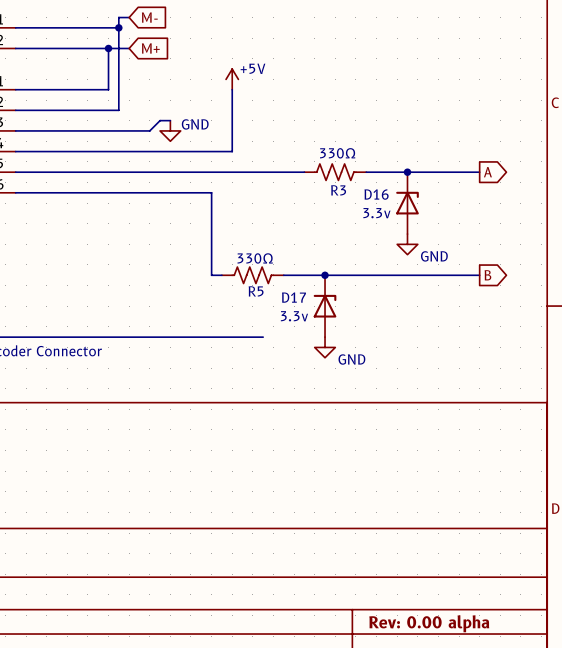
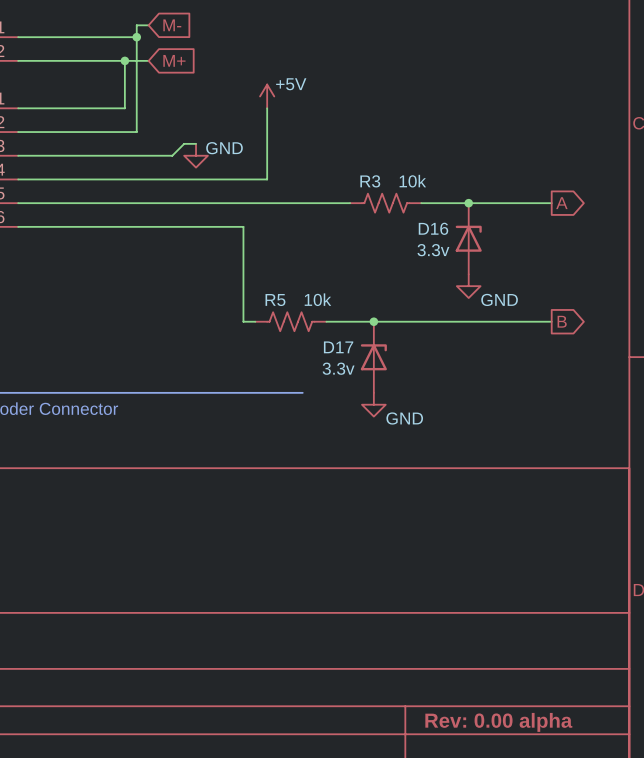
R3 value: 330Ω (337, 153) -> 10k (412, 181)
R3 name position: R3 (338, 190) -> R3 (370, 181)
R5 value: 330Ω (255, 258) -> 10k (317, 299)
R5 name position: R5 (256, 291) -> R5 (275, 300)

